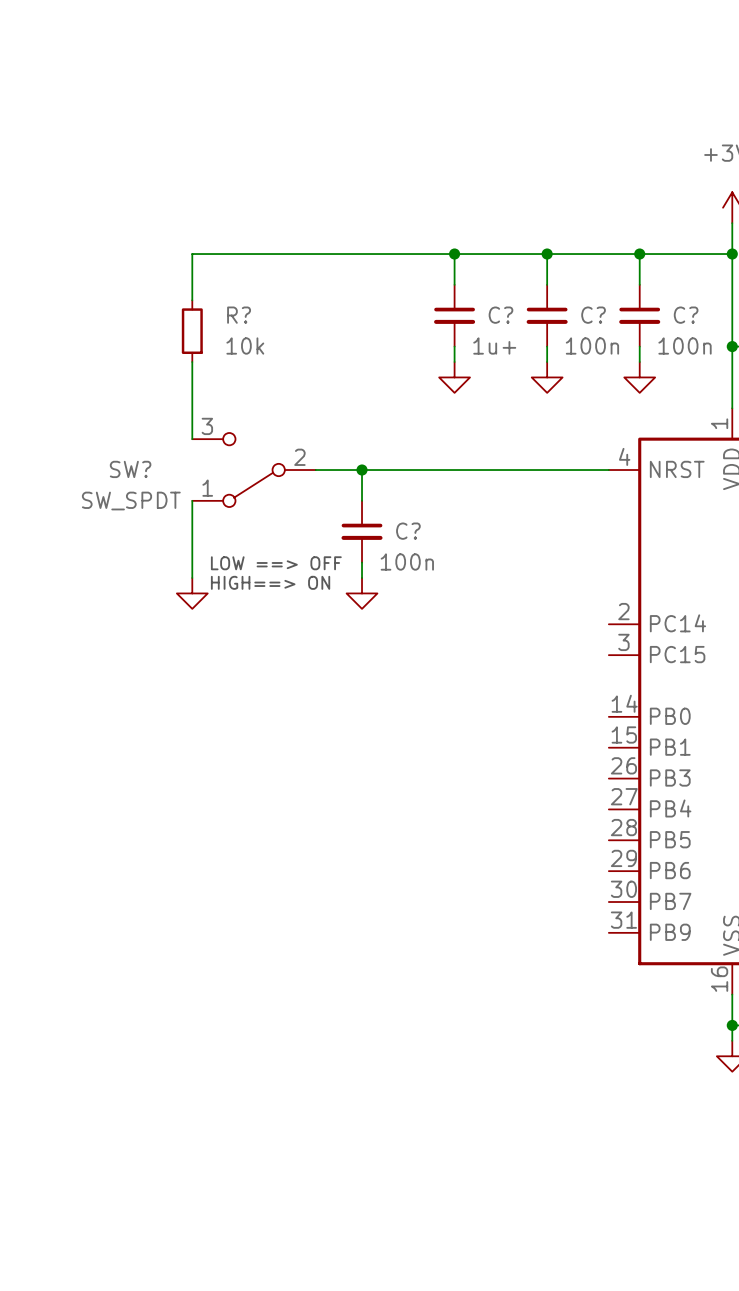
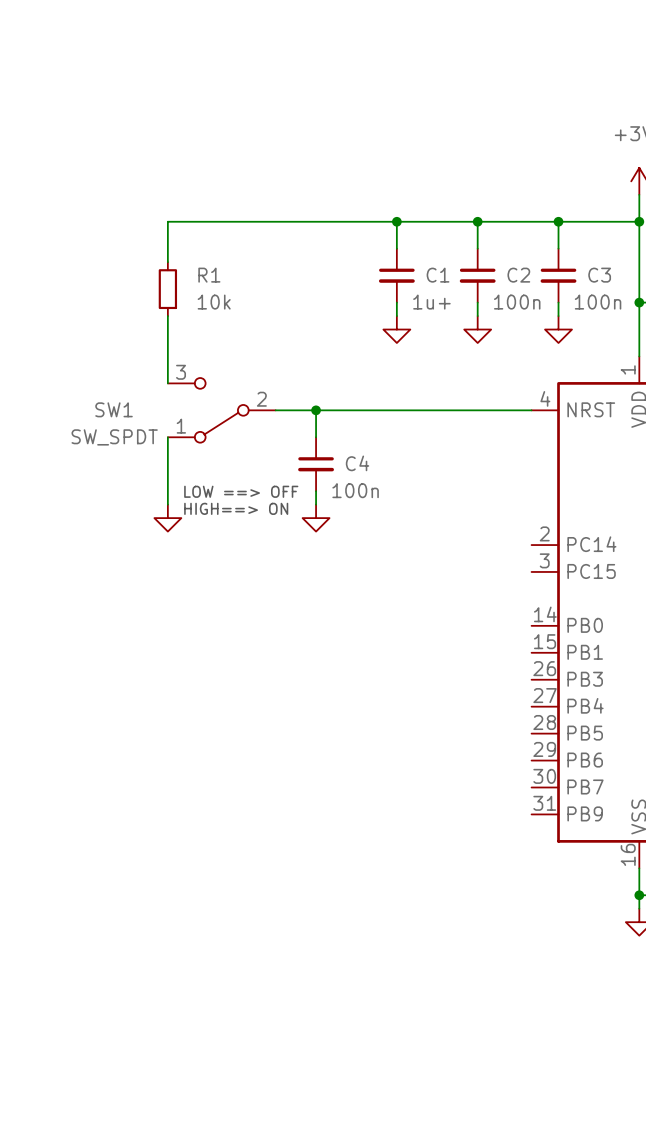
R? name: R? (239, 315) -> R1 (209, 275)
C? name: C? (500, 315) -> C1 (438, 275)
C? name: C? (593, 315) -> C2 (518, 275)
C? name: C? (686, 315) -> C3 (599, 275)
SW? name: SW? (130, 469) -> SW1 (114, 409)
C? name: C? (408, 531) -> C4 (357, 463)

